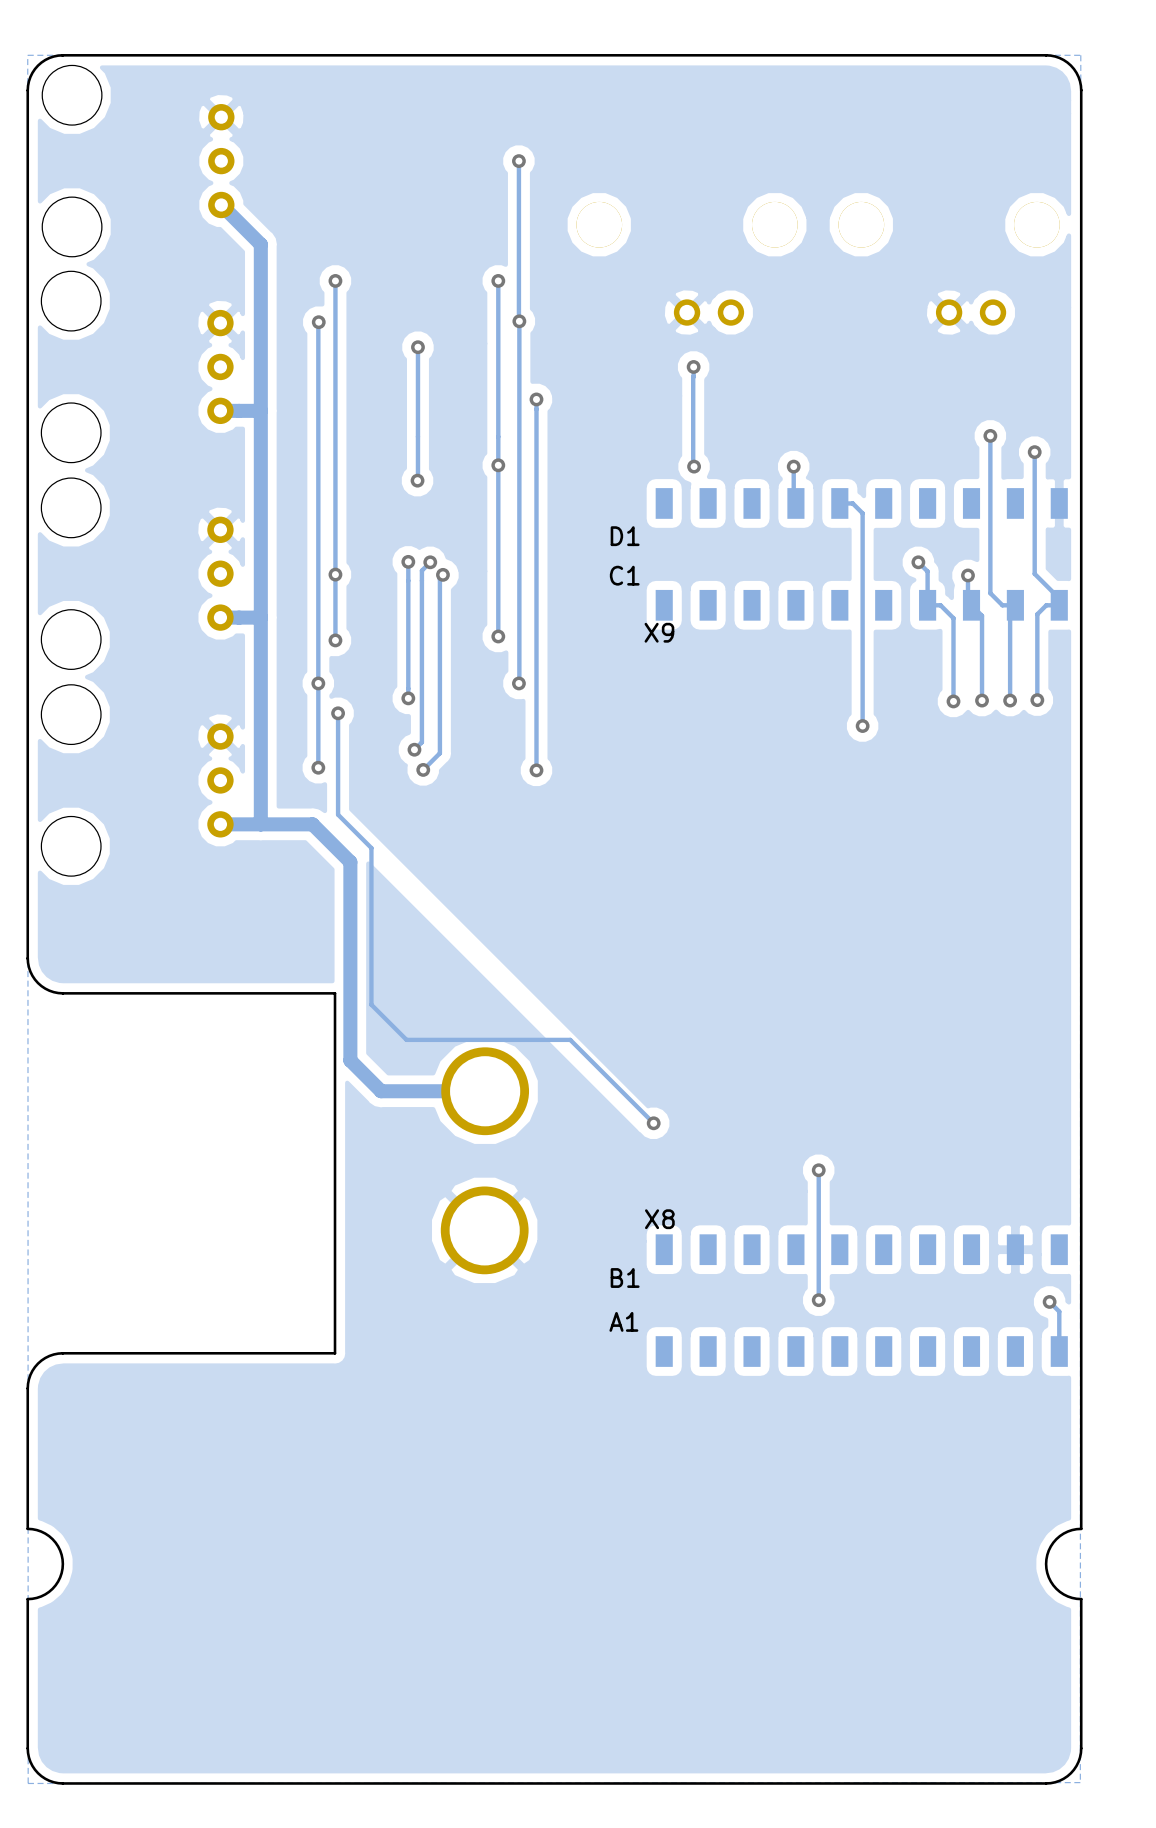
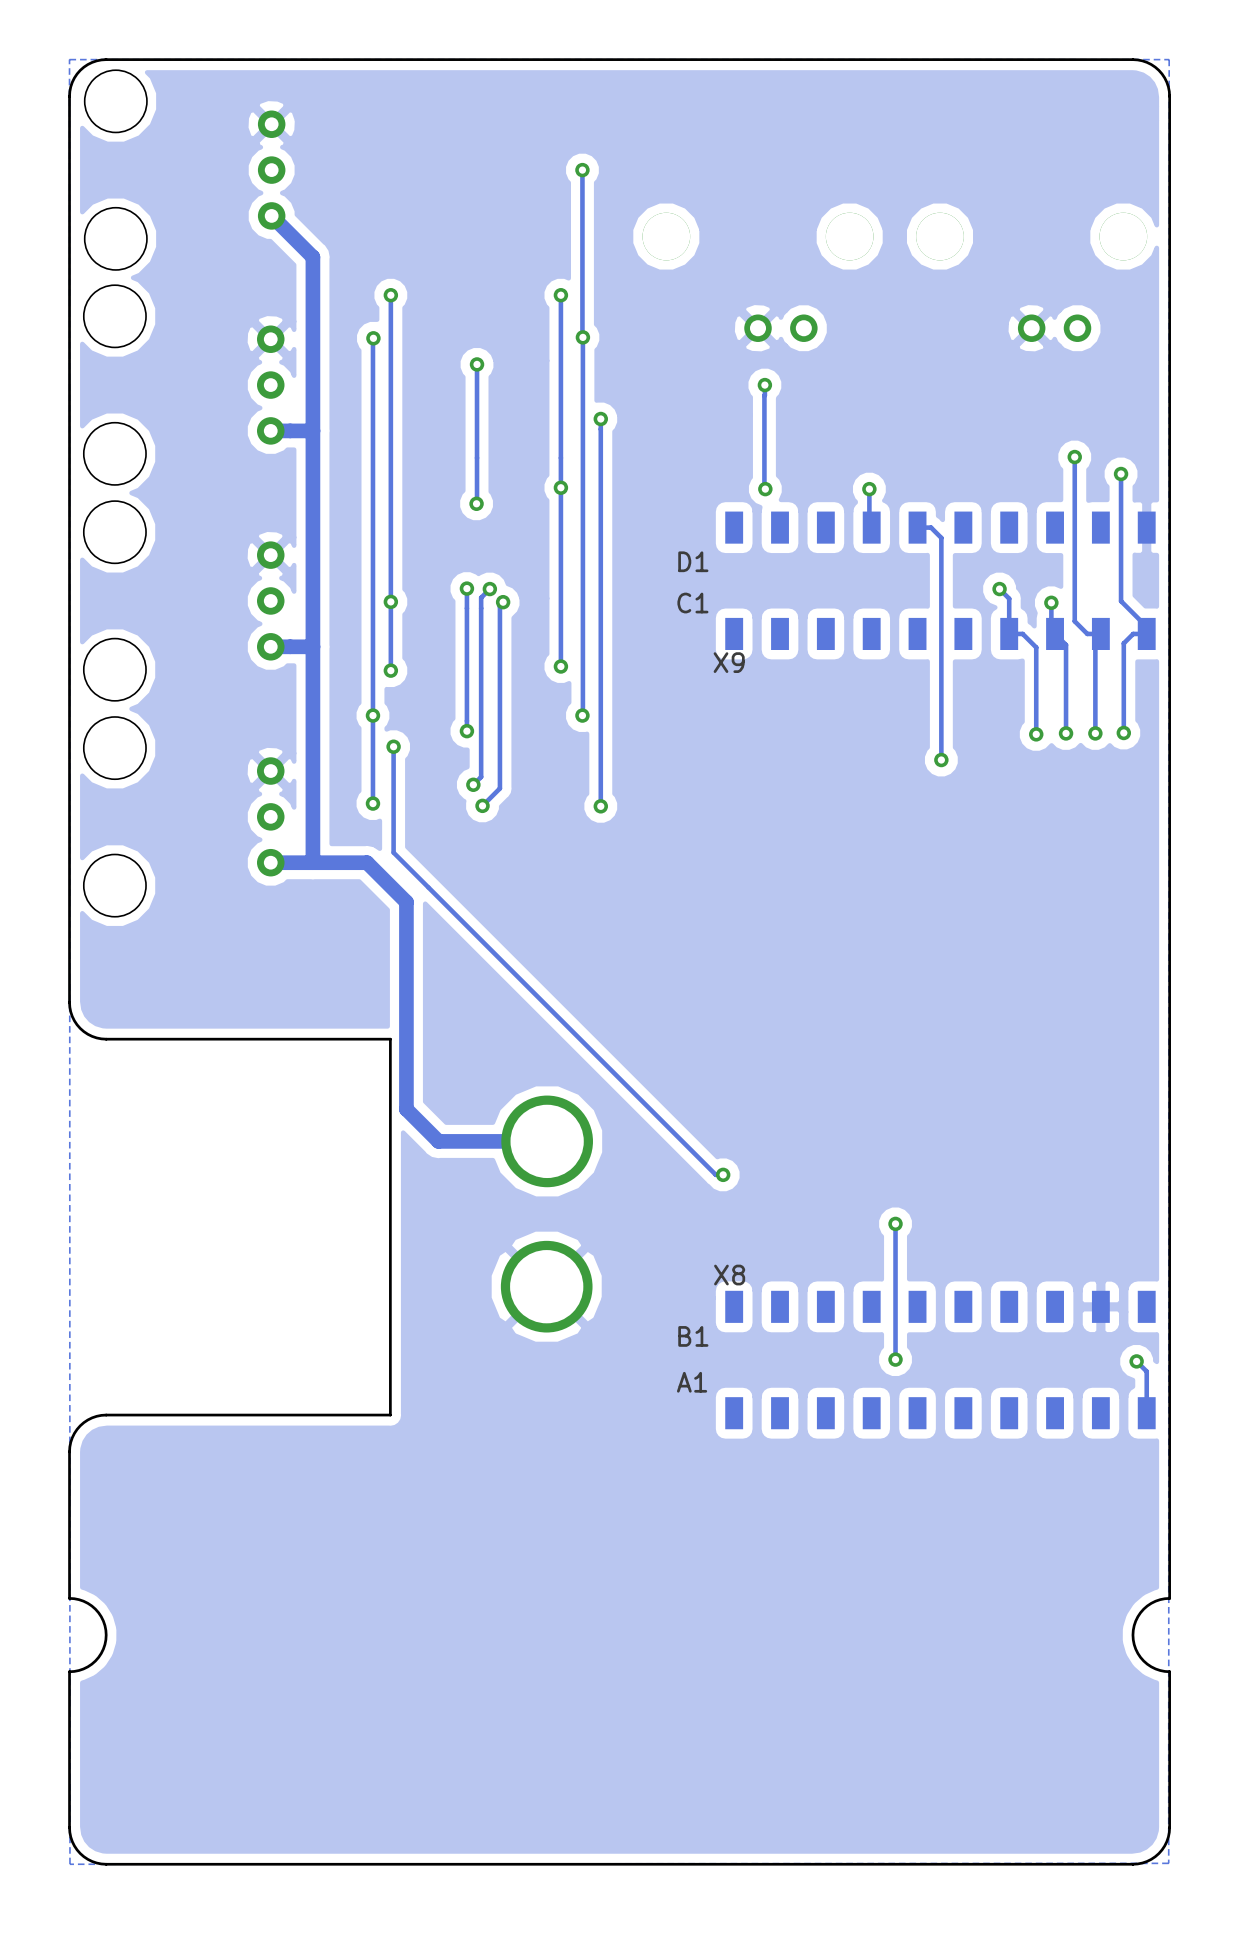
track: (371, 848) (371, 1004) (406, 1039) (570, 1039) (653, 1123) -> (428, 887) (715, 1174) (723, 1174)

